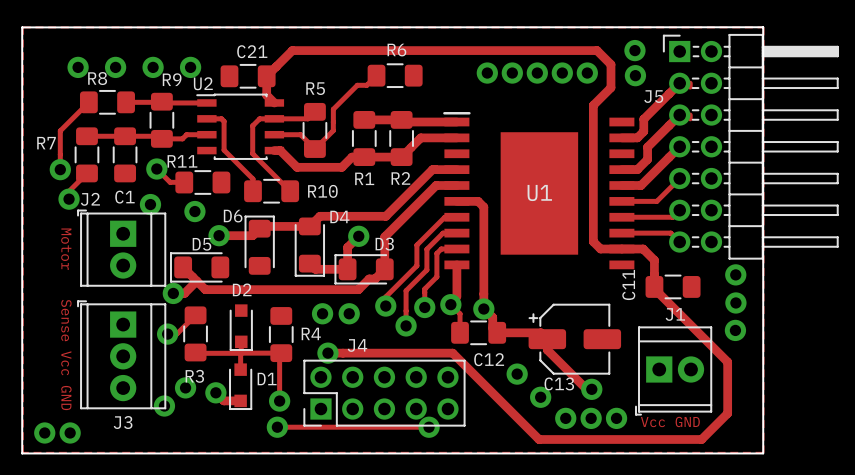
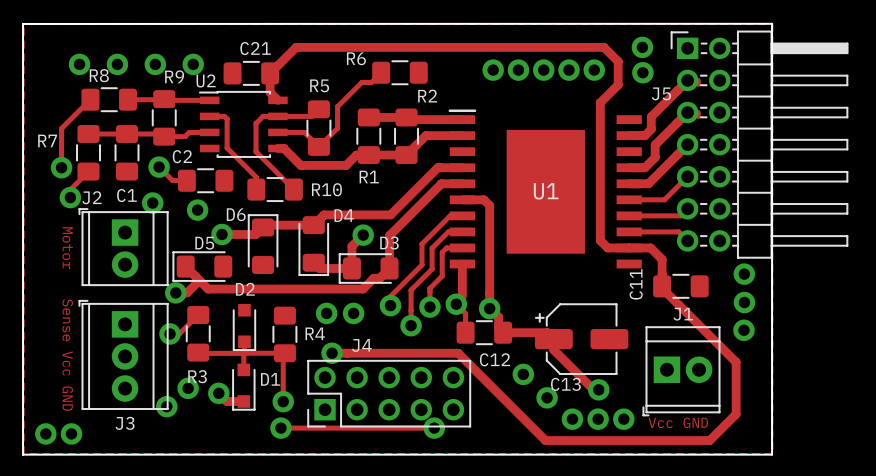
R6 name position: R6 (396, 50) -> R6 (356, 58)
R11 name: R11 (182, 161) -> C2 (182, 156)
R2 name position: R2 (400, 178) -> R2 (427, 96)

